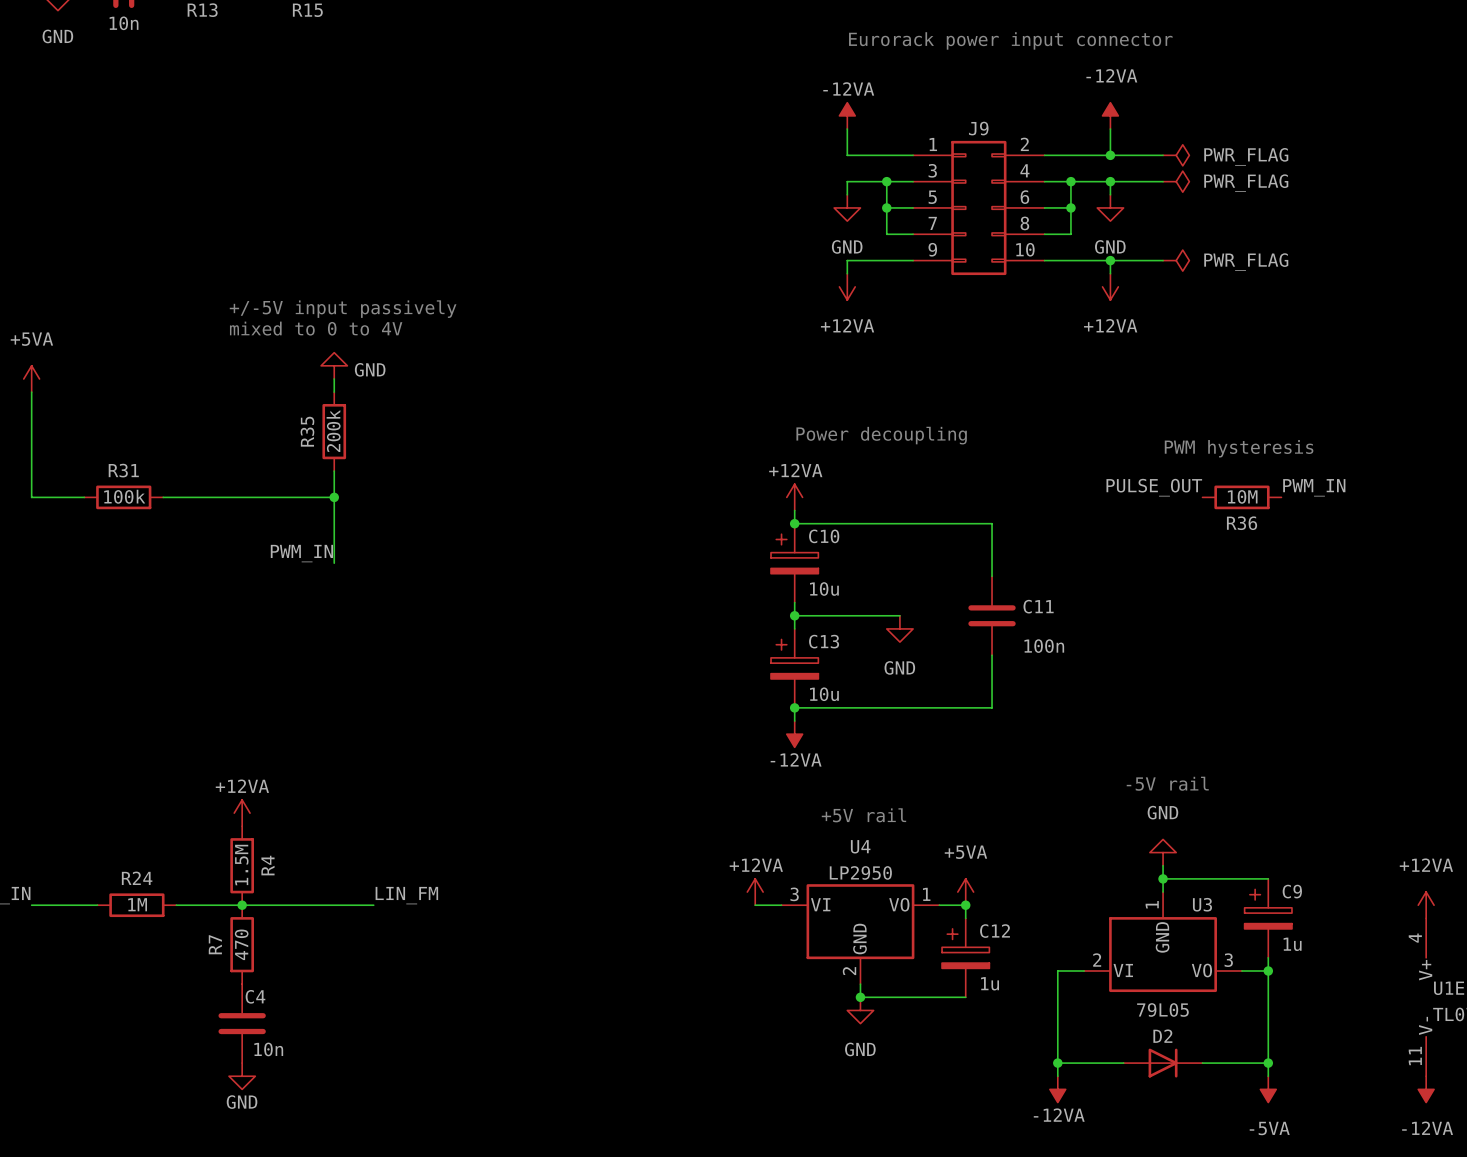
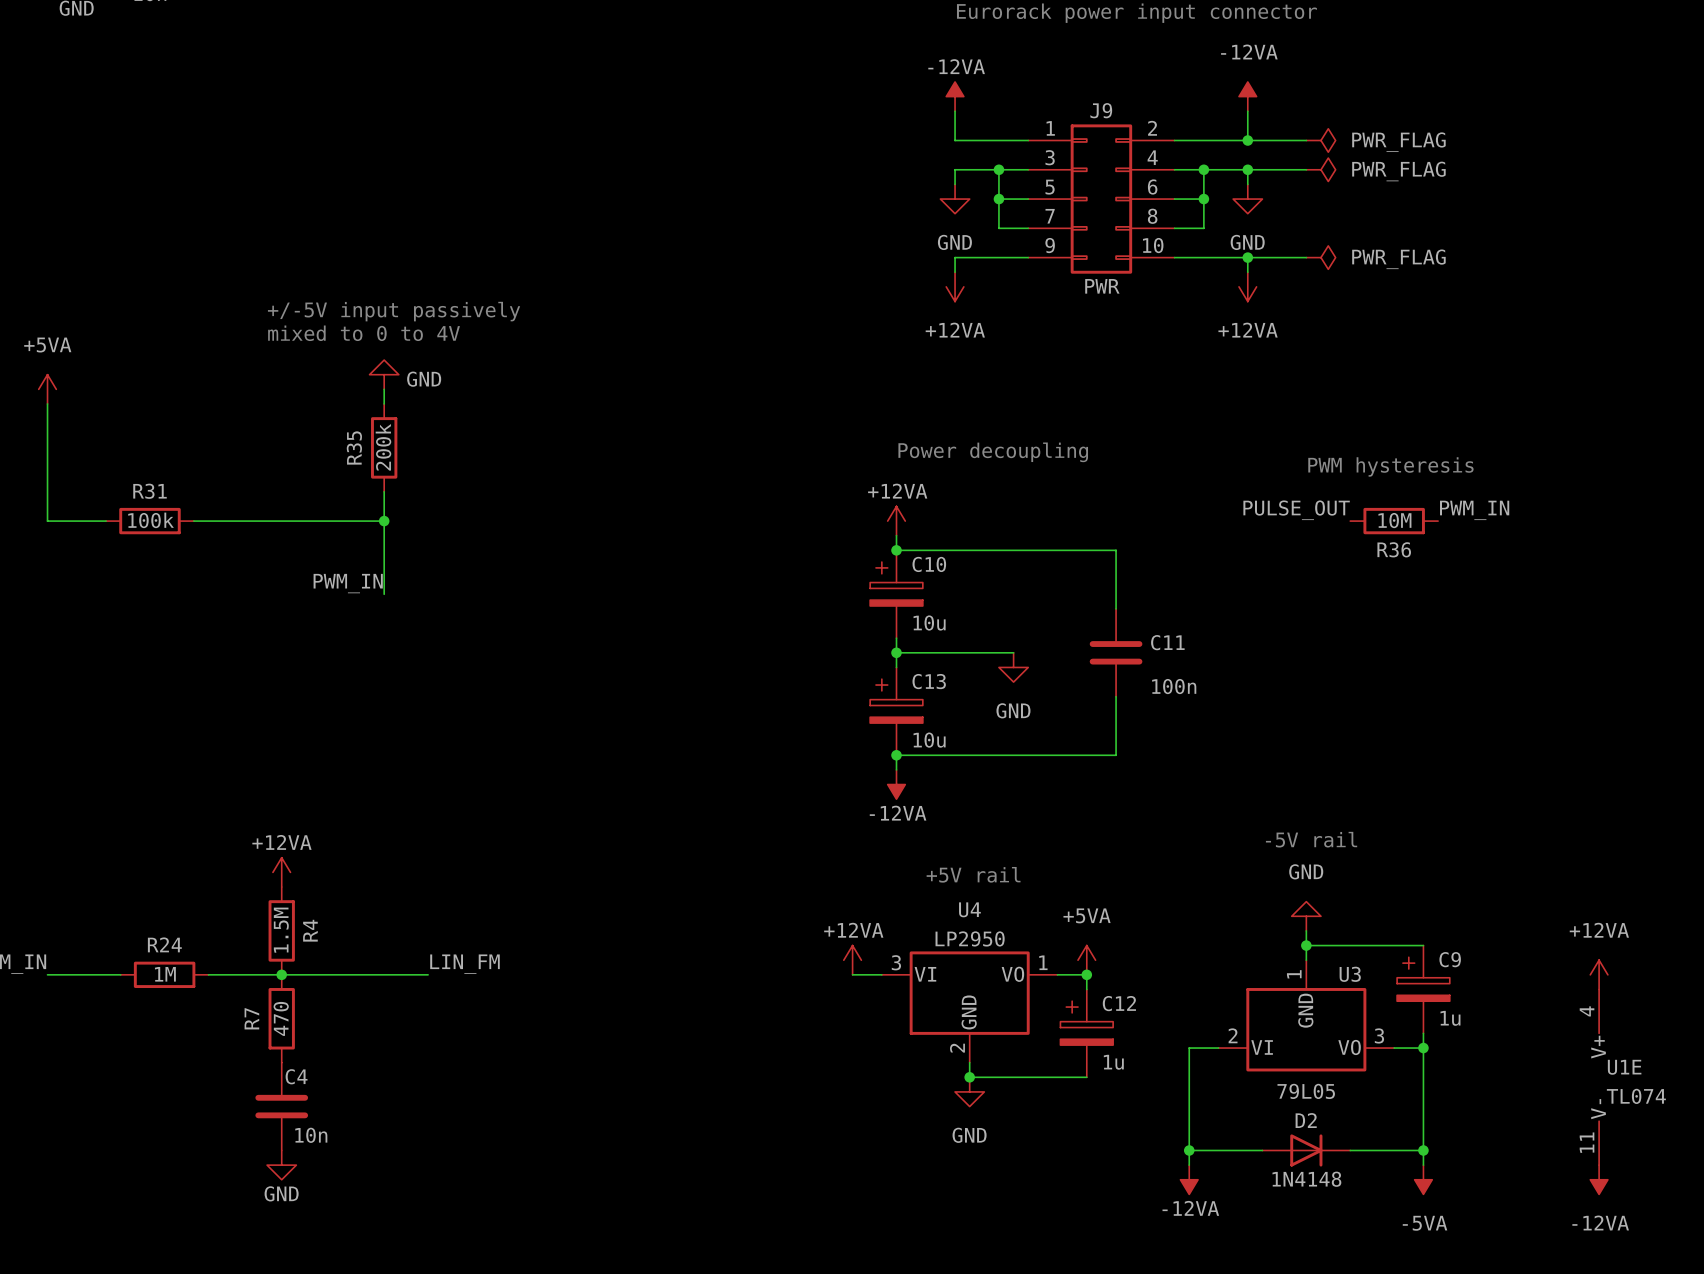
J9 value: none -> PWR (1102, 286)
D2 value: none -> 1N4148 (1306, 1179)

